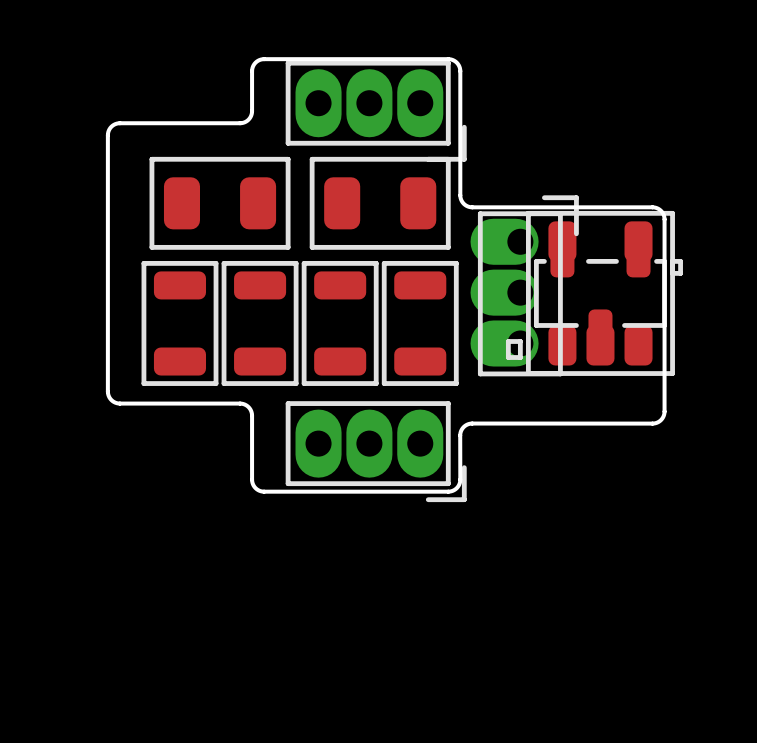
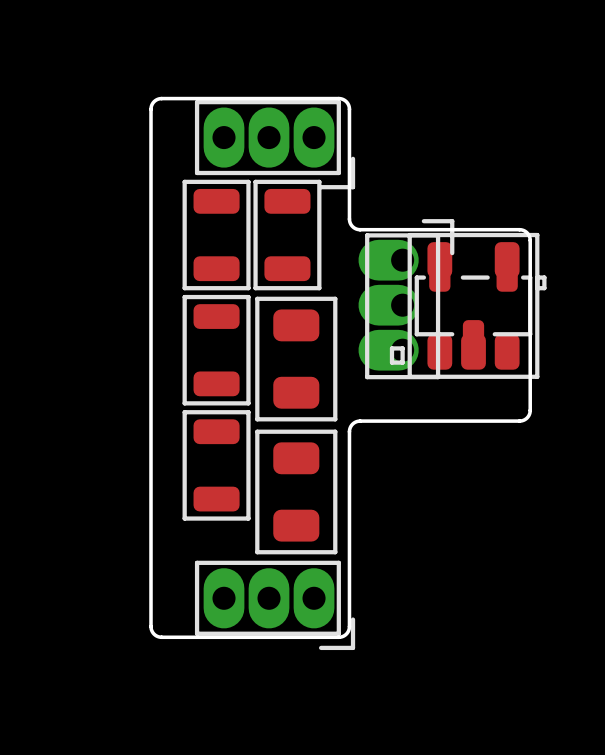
board edge: (264, 59) (256, 61) (252, 68) (251, 112) (249, 118) (244, 122) (119, 123) (112, 125) (108, 130) (107, 391) (111, 400) (119, 403) (240, 403) (246, 405) (251, 414) (252, 482) (256, 489) (264, 491) (449, 491) (456, 488) (459, 482) (460, 433) (462, 428) (469, 423) (652, 423) -> (175, 98) (157, 99) (152, 103) (151, 109) (151, 626) (154, 634) (161, 637) (344, 635) (349, 626) (349, 431) (351, 425) (360, 421) (519, 421)
part footprint: [309, 156, 451, 250] -> [253, 179, 322, 291]
part: (220, 203) -> none
part: none -> (216, 235)
part: (179, 323) -> none
part: (260, 323) -> none
part: (340, 323) -> none
part: (420, 323) -> none
part: none -> (216, 350)
part: none -> (296, 359)
part position: (376, 451) -> (275, 605)
part: none -> (216, 465)
part: none -> (296, 491)

